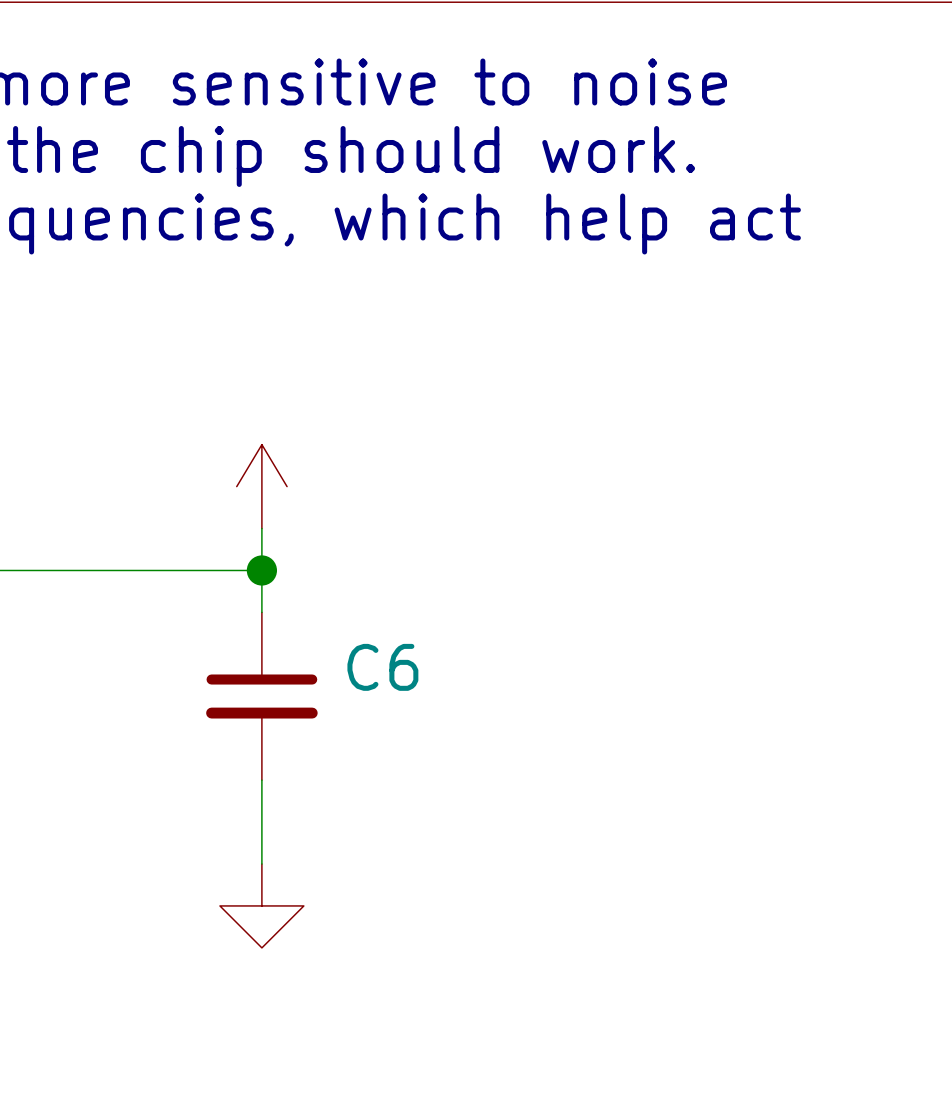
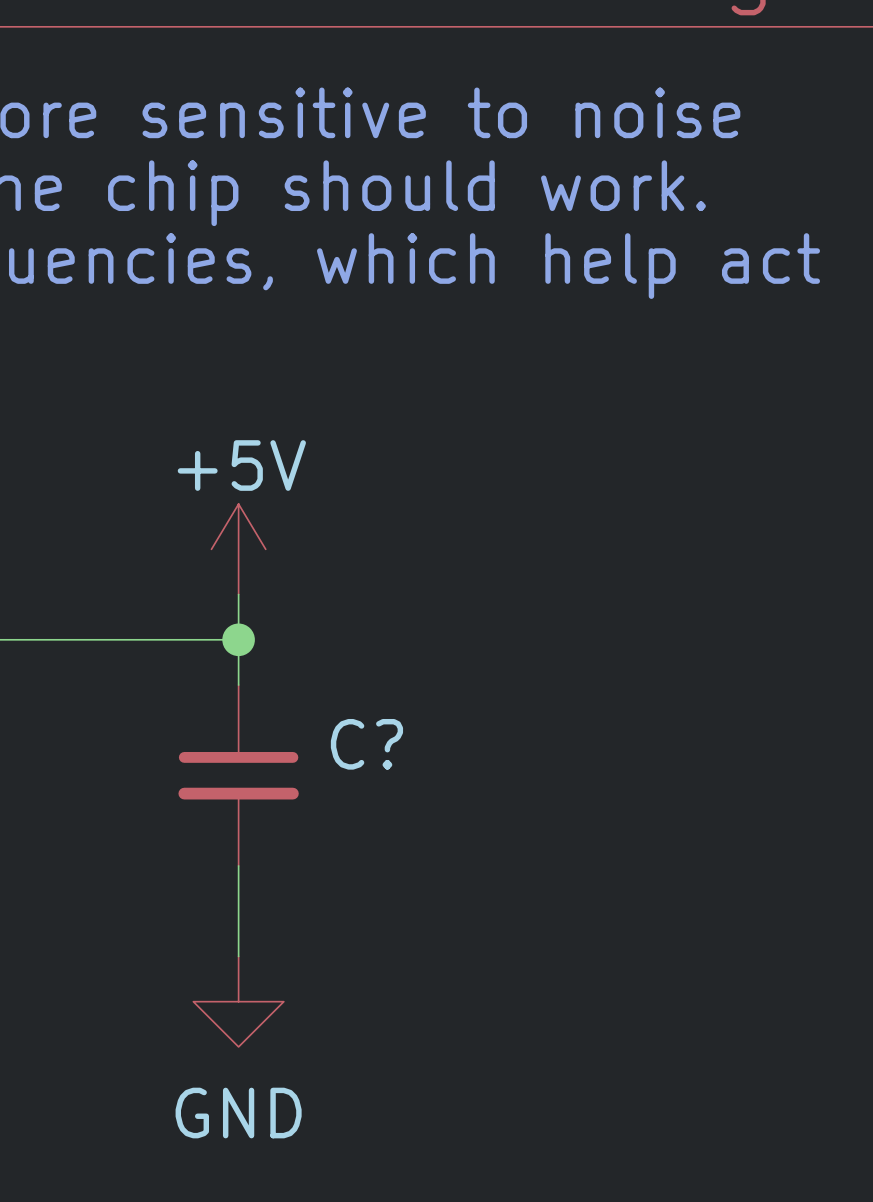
power symbol text: none -> +5V (241, 465)
C6 name: C6 (382, 667) -> C? (366, 744)
power symbol text: none -> GND (238, 1113)

